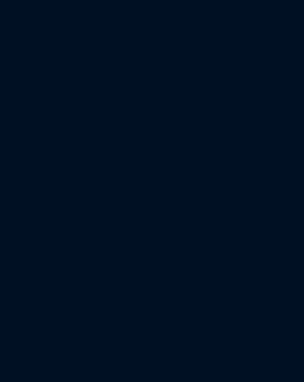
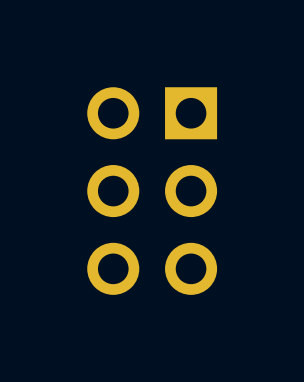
part: none -> (152, 191)

